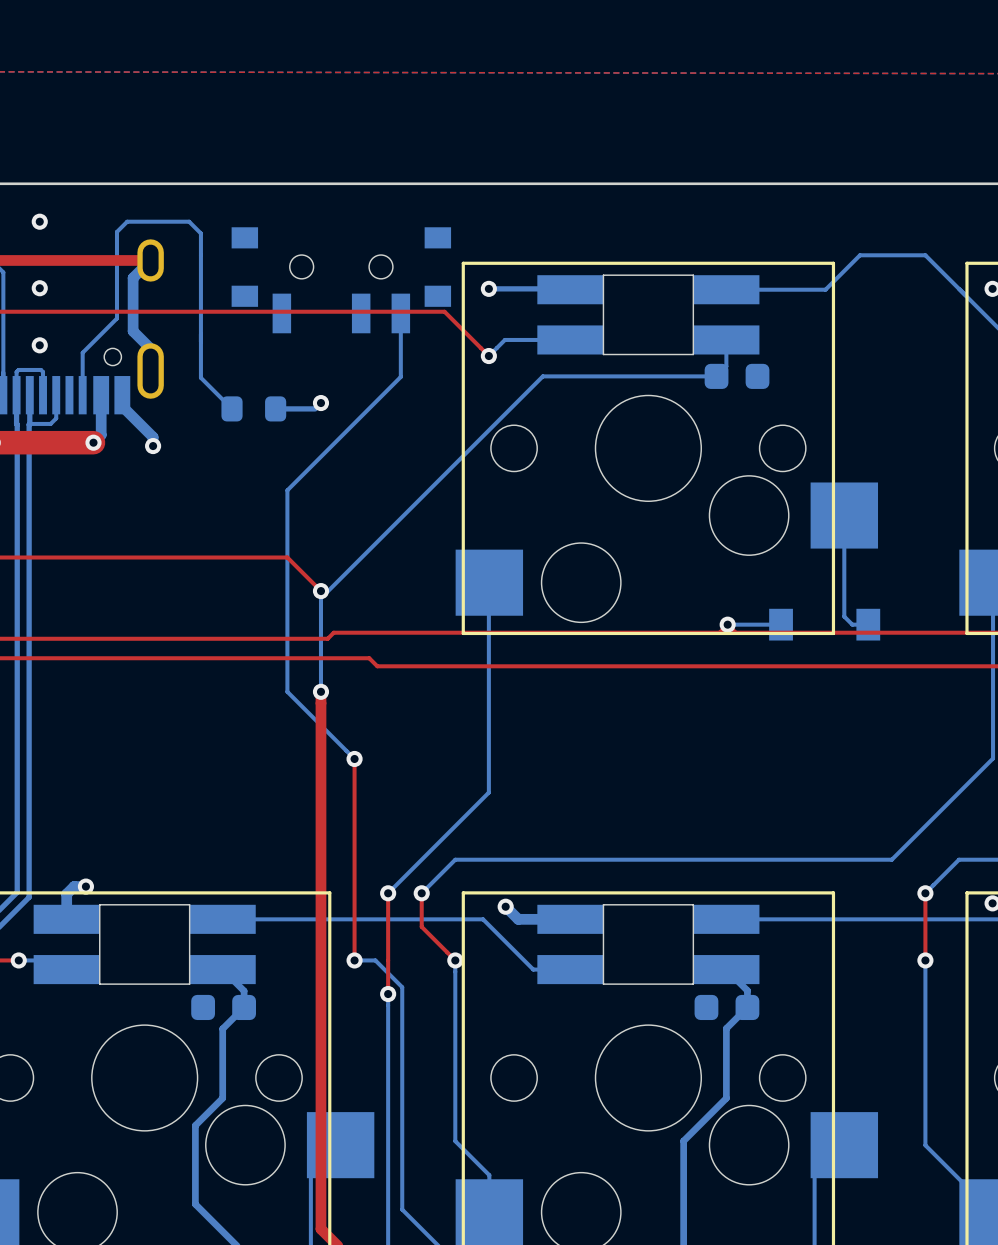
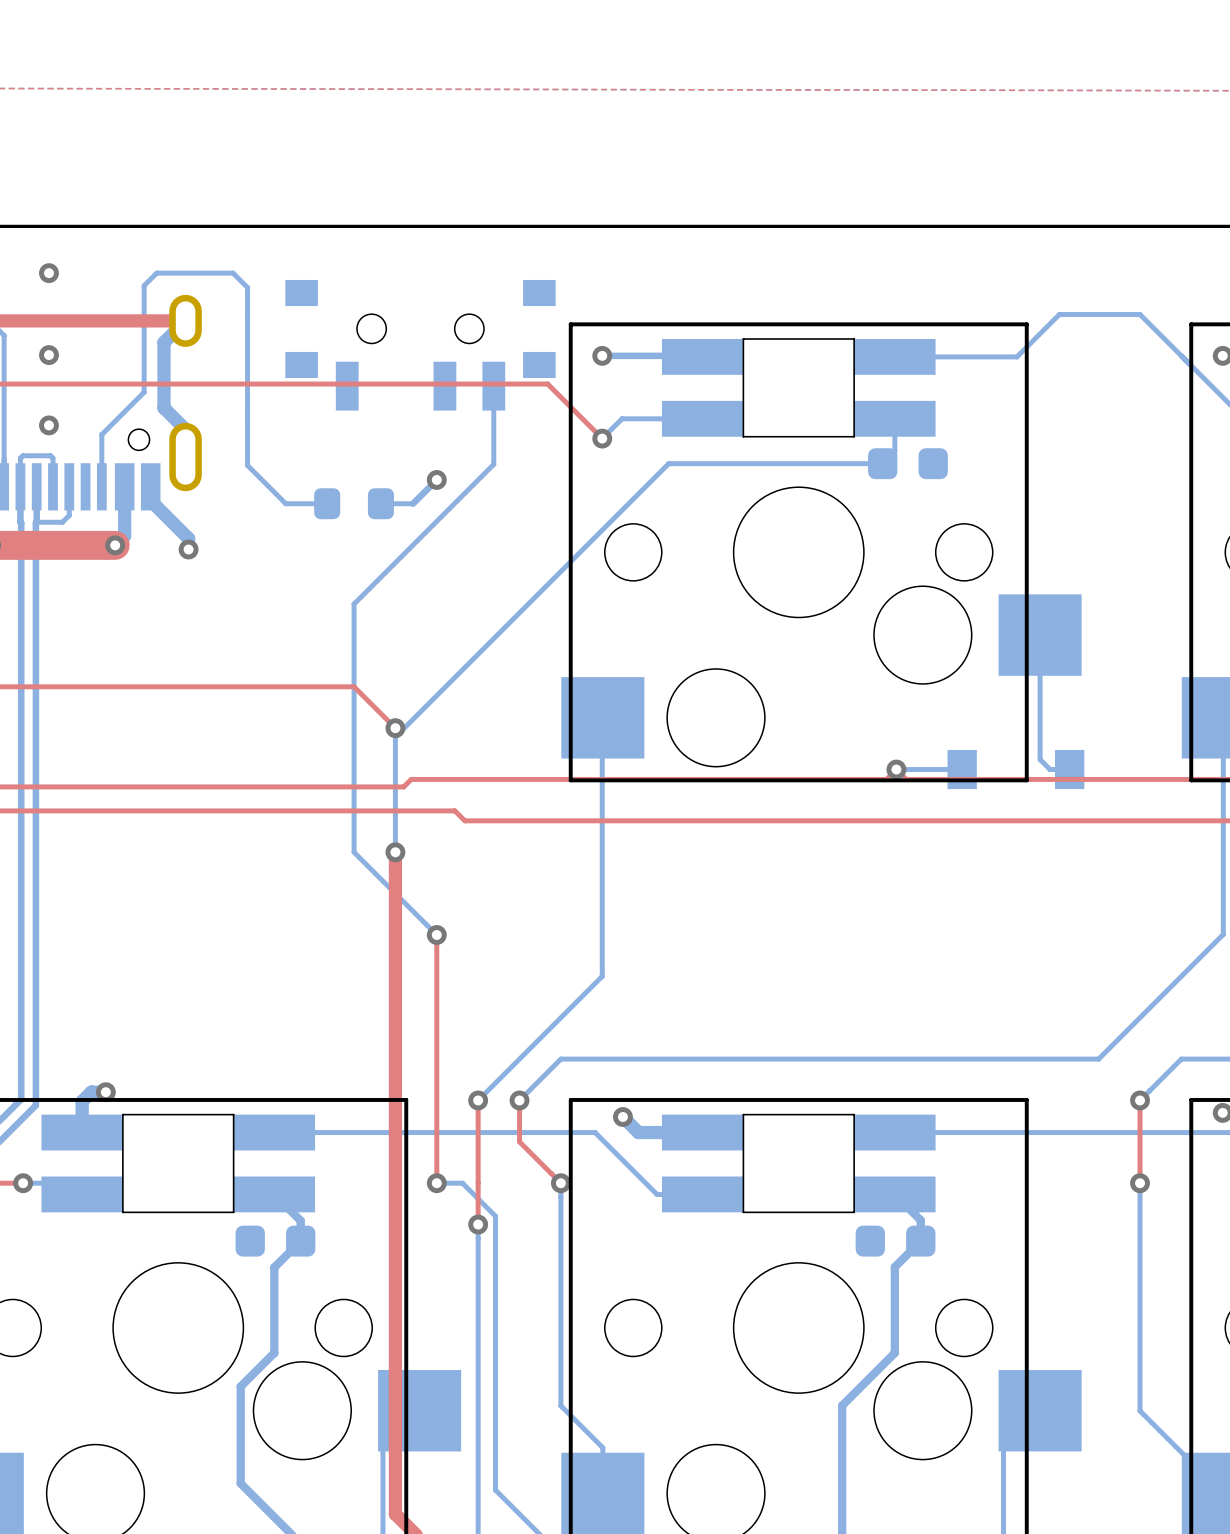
bottom track: none -> (436, 479) (413, 503) (388, 503)
via position: (320, 403) -> (436, 479)
part position: (253, 408) -> (354, 503)
bottom track: (275, 408) (309, 408) -> (285, 503) (327, 503)

